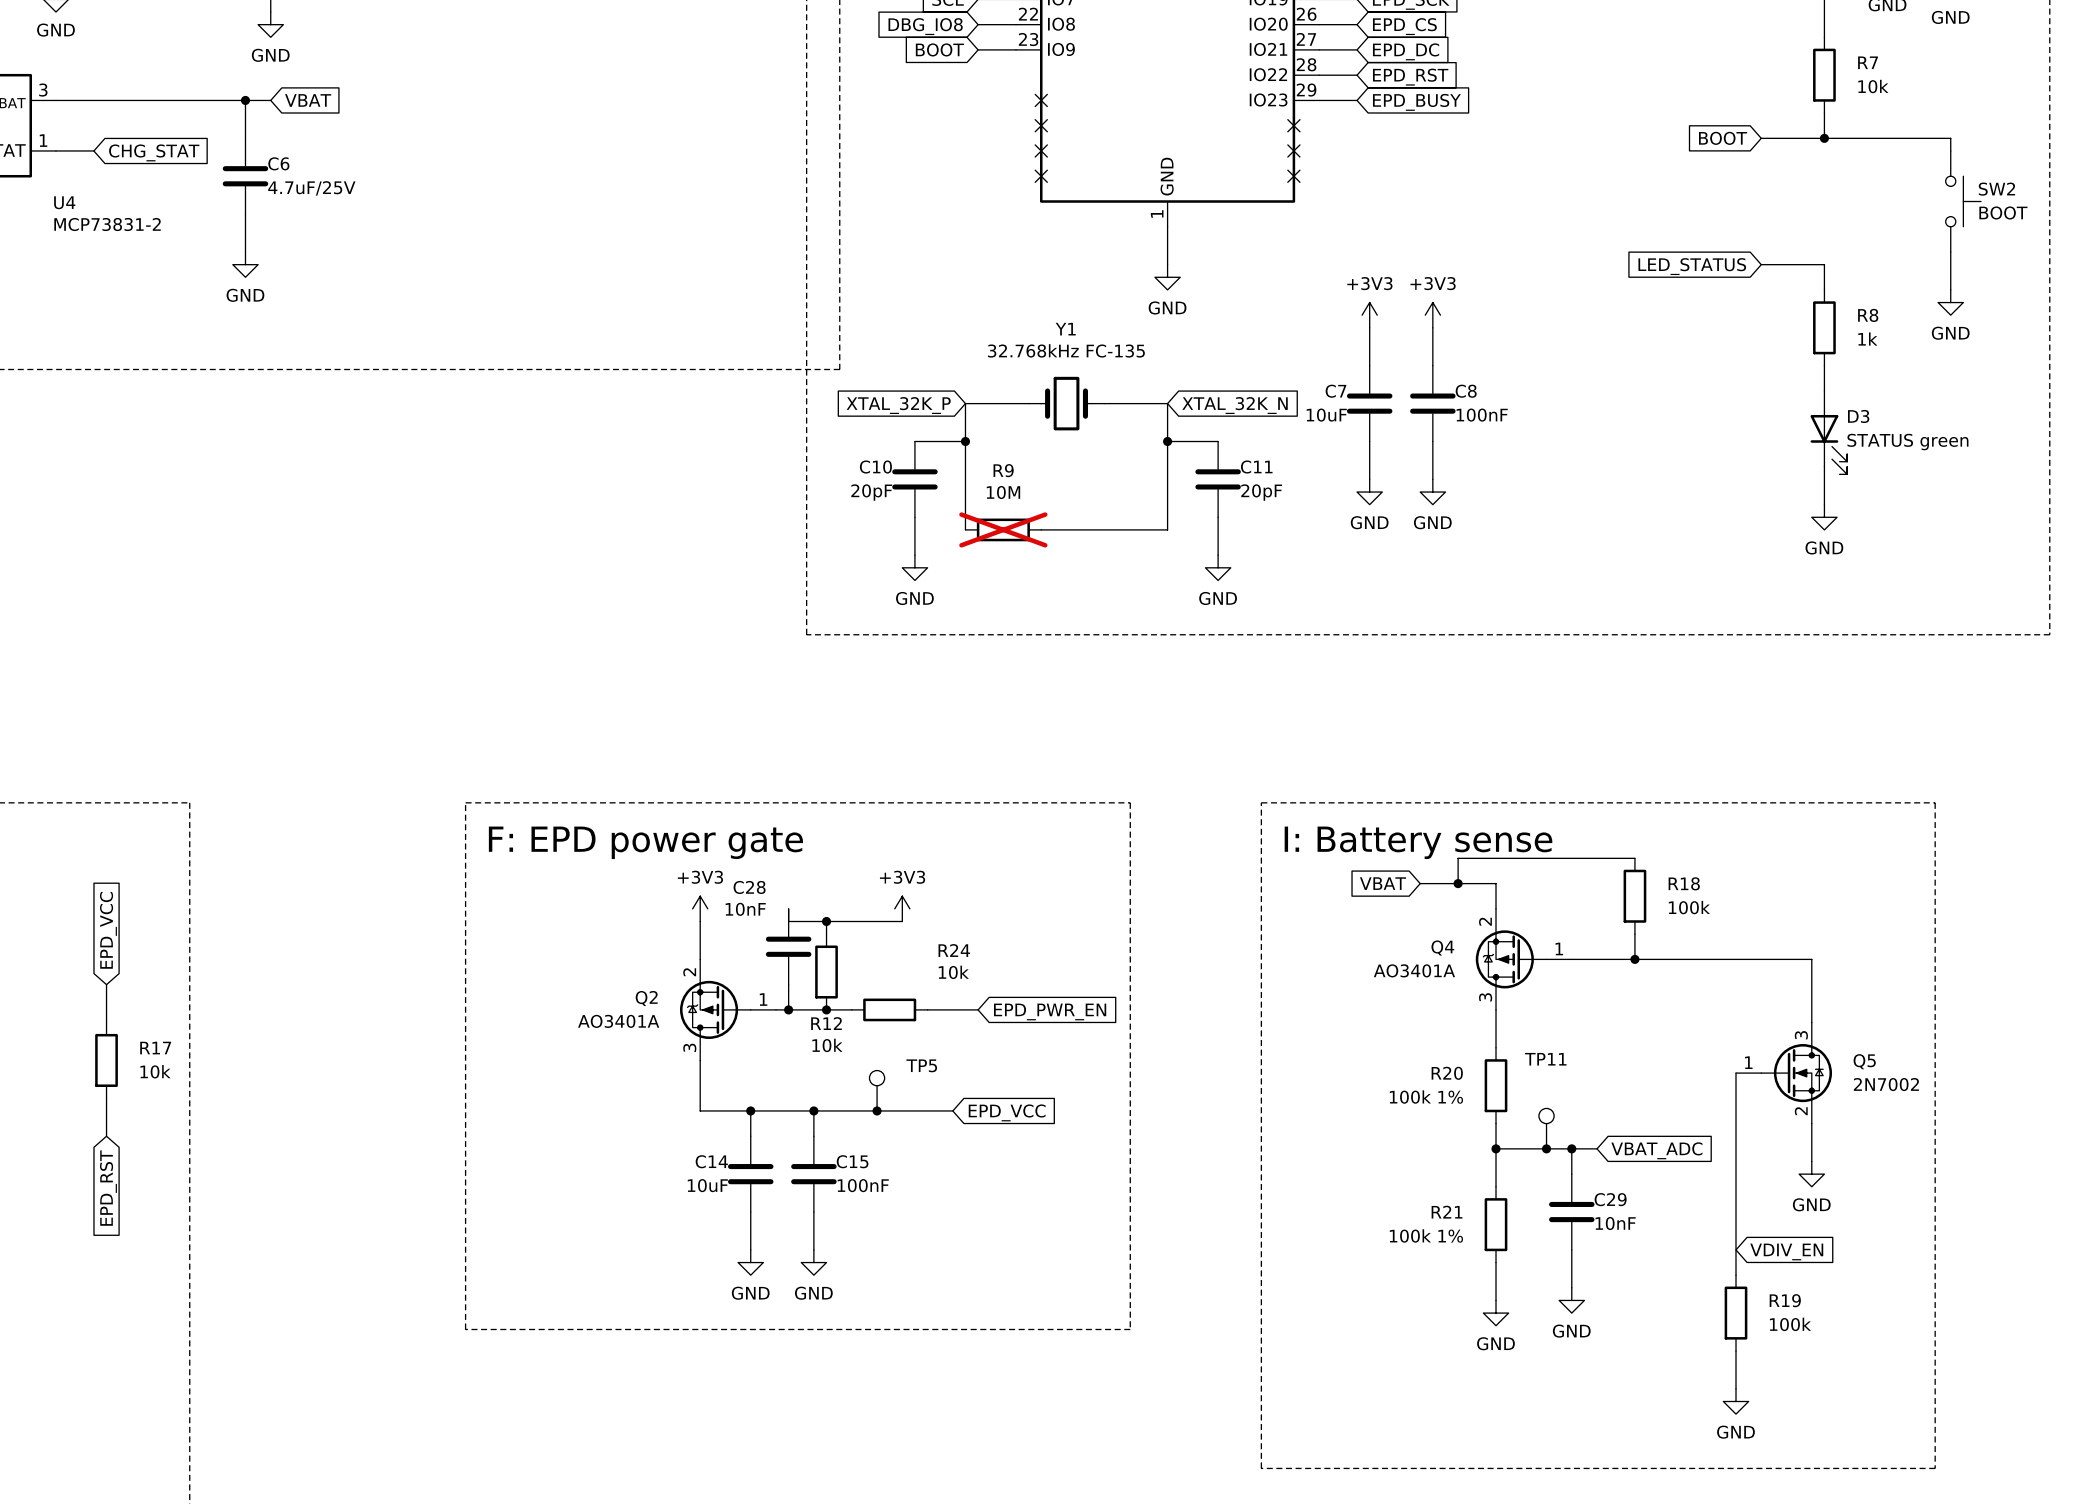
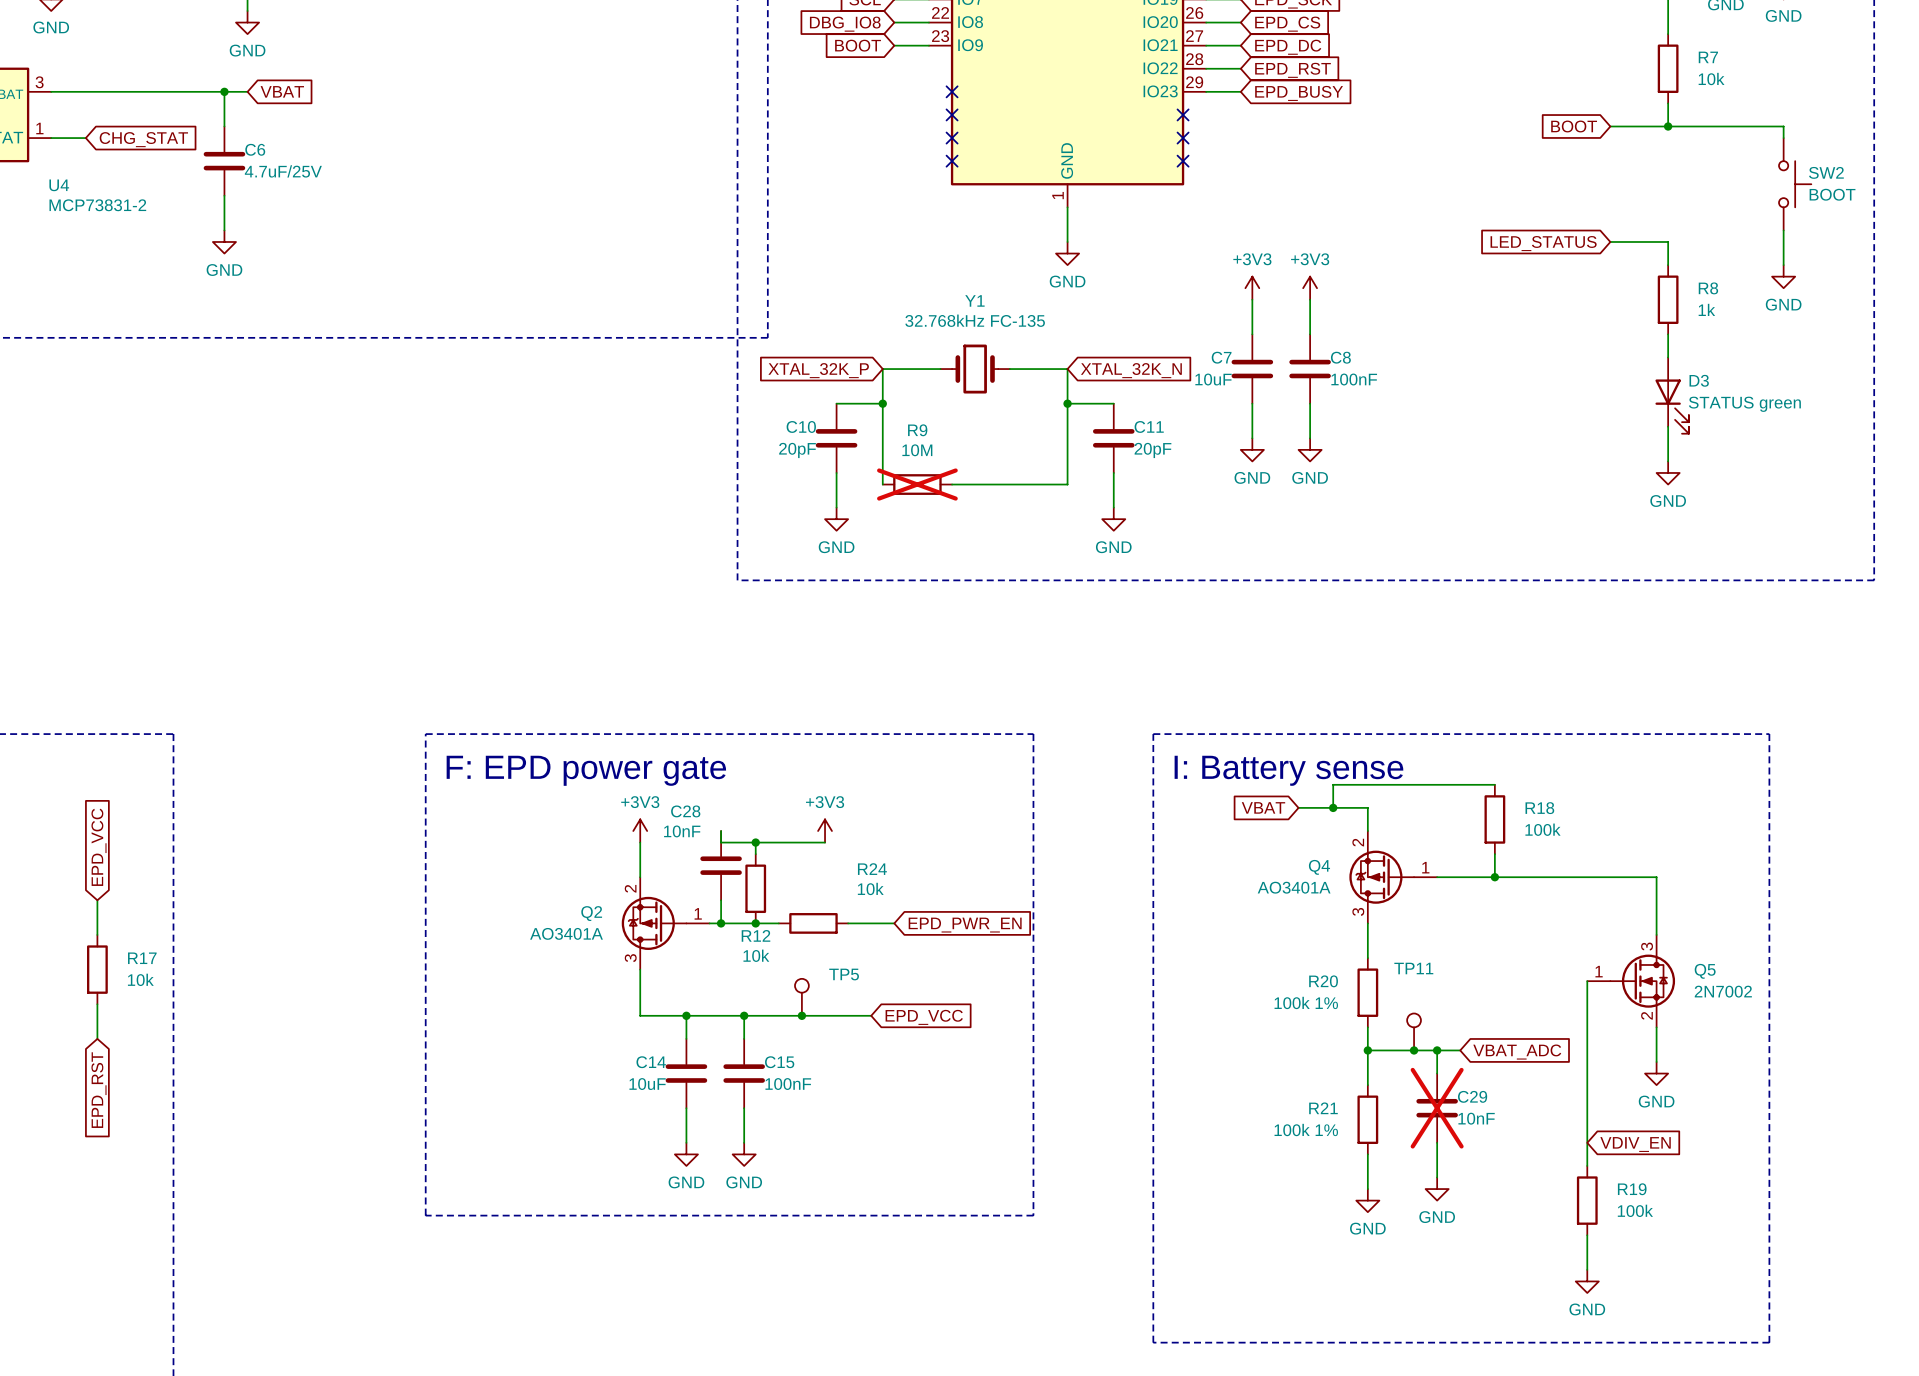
C29 do-not-place cross: none -> (1437, 1108)

